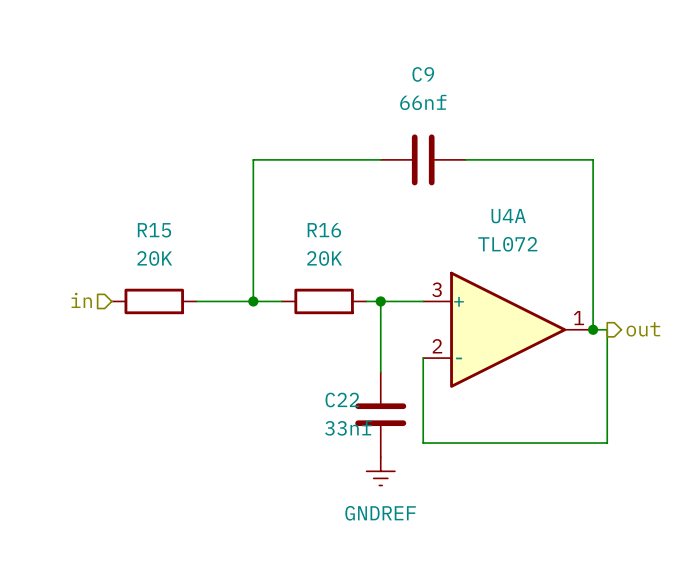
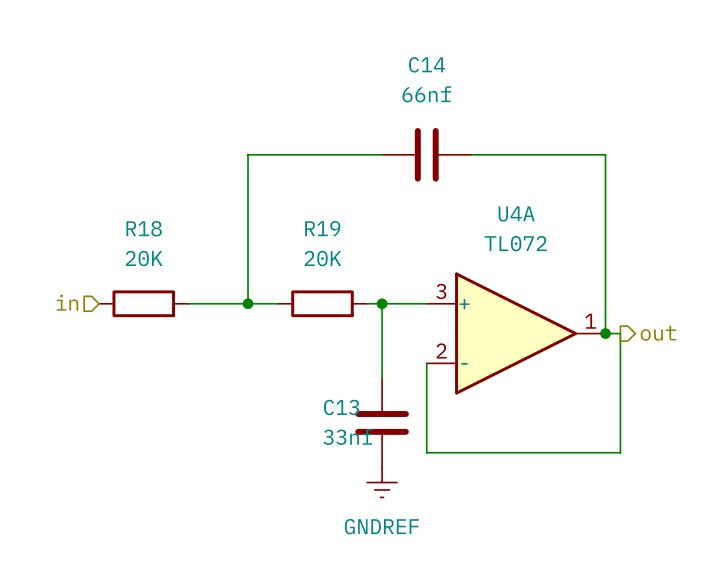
C9 name: C9 (423, 74) -> C14 (427, 64)
R15 name: R15 (154, 230) -> R18 (144, 228)
R16 name: R16 (324, 230) -> R19 (322, 228)
C22 name: C22 (342, 400) -> C13 (341, 407)

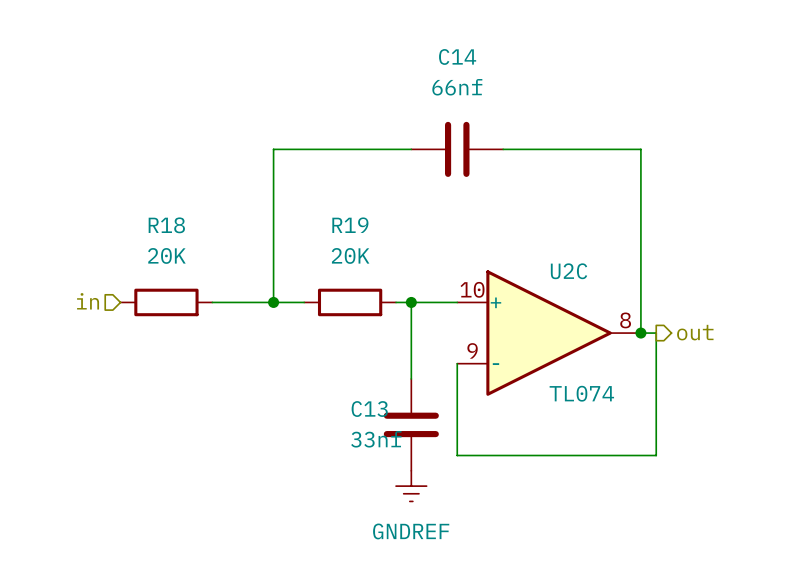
U4A name: U4A (516, 213) -> U2C (569, 271)
U4A value: TL072 (515, 243) -> TL074 (581, 393)
U4A pin number: 3 (441, 291) -> 10 (472, 289)
U4A pin number: 1 (590, 321) -> 8 (625, 320)
U4A pin number: 2 (441, 350) -> 9 (472, 350)

